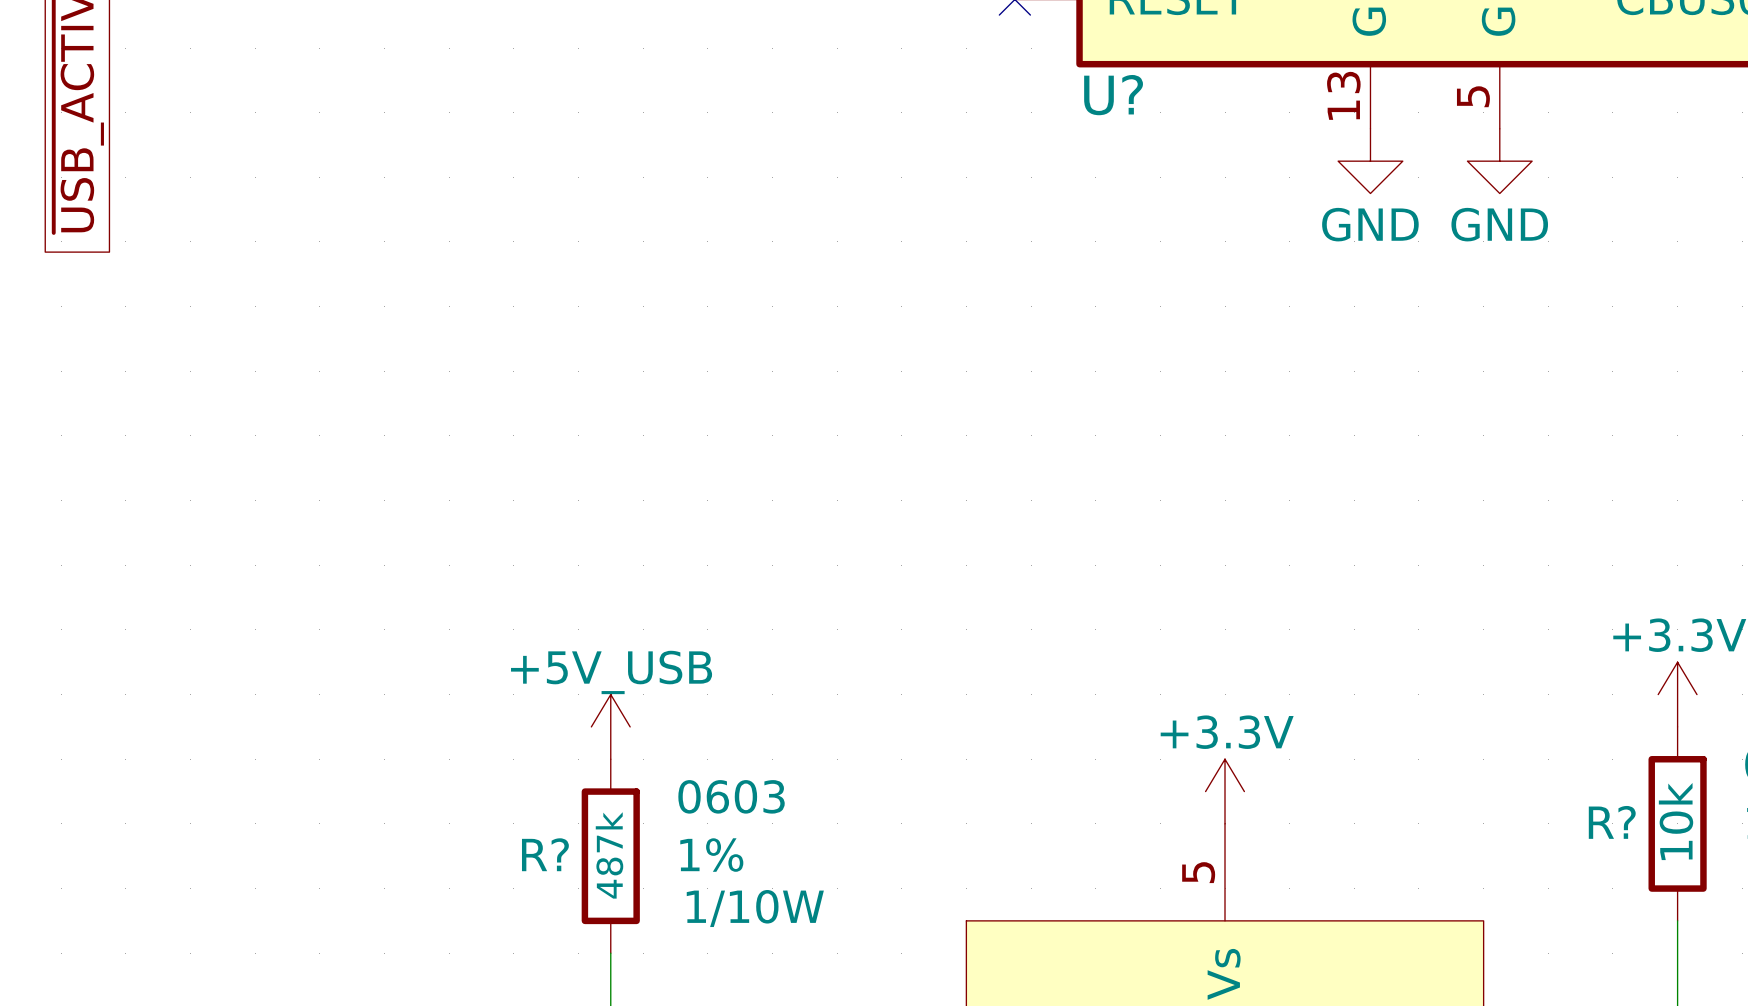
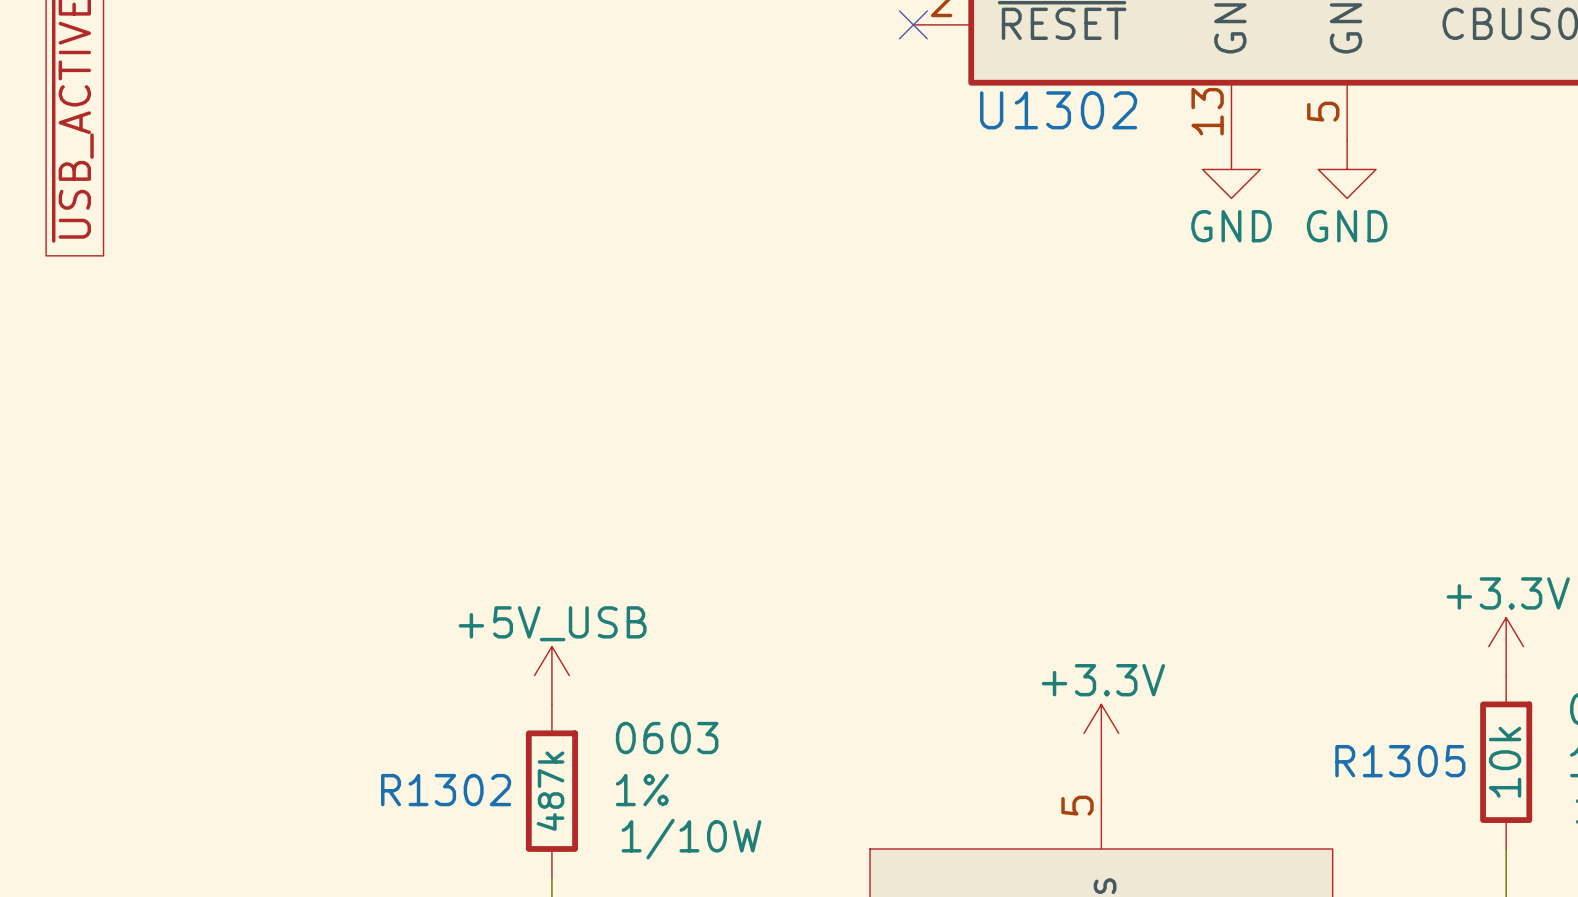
U? name: U? (1113, 95) -> U1302 (1058, 110)
R? name: R? (1612, 822) -> R1305 (1400, 761)
R? name: R? (545, 854) -> R1302 (446, 790)

